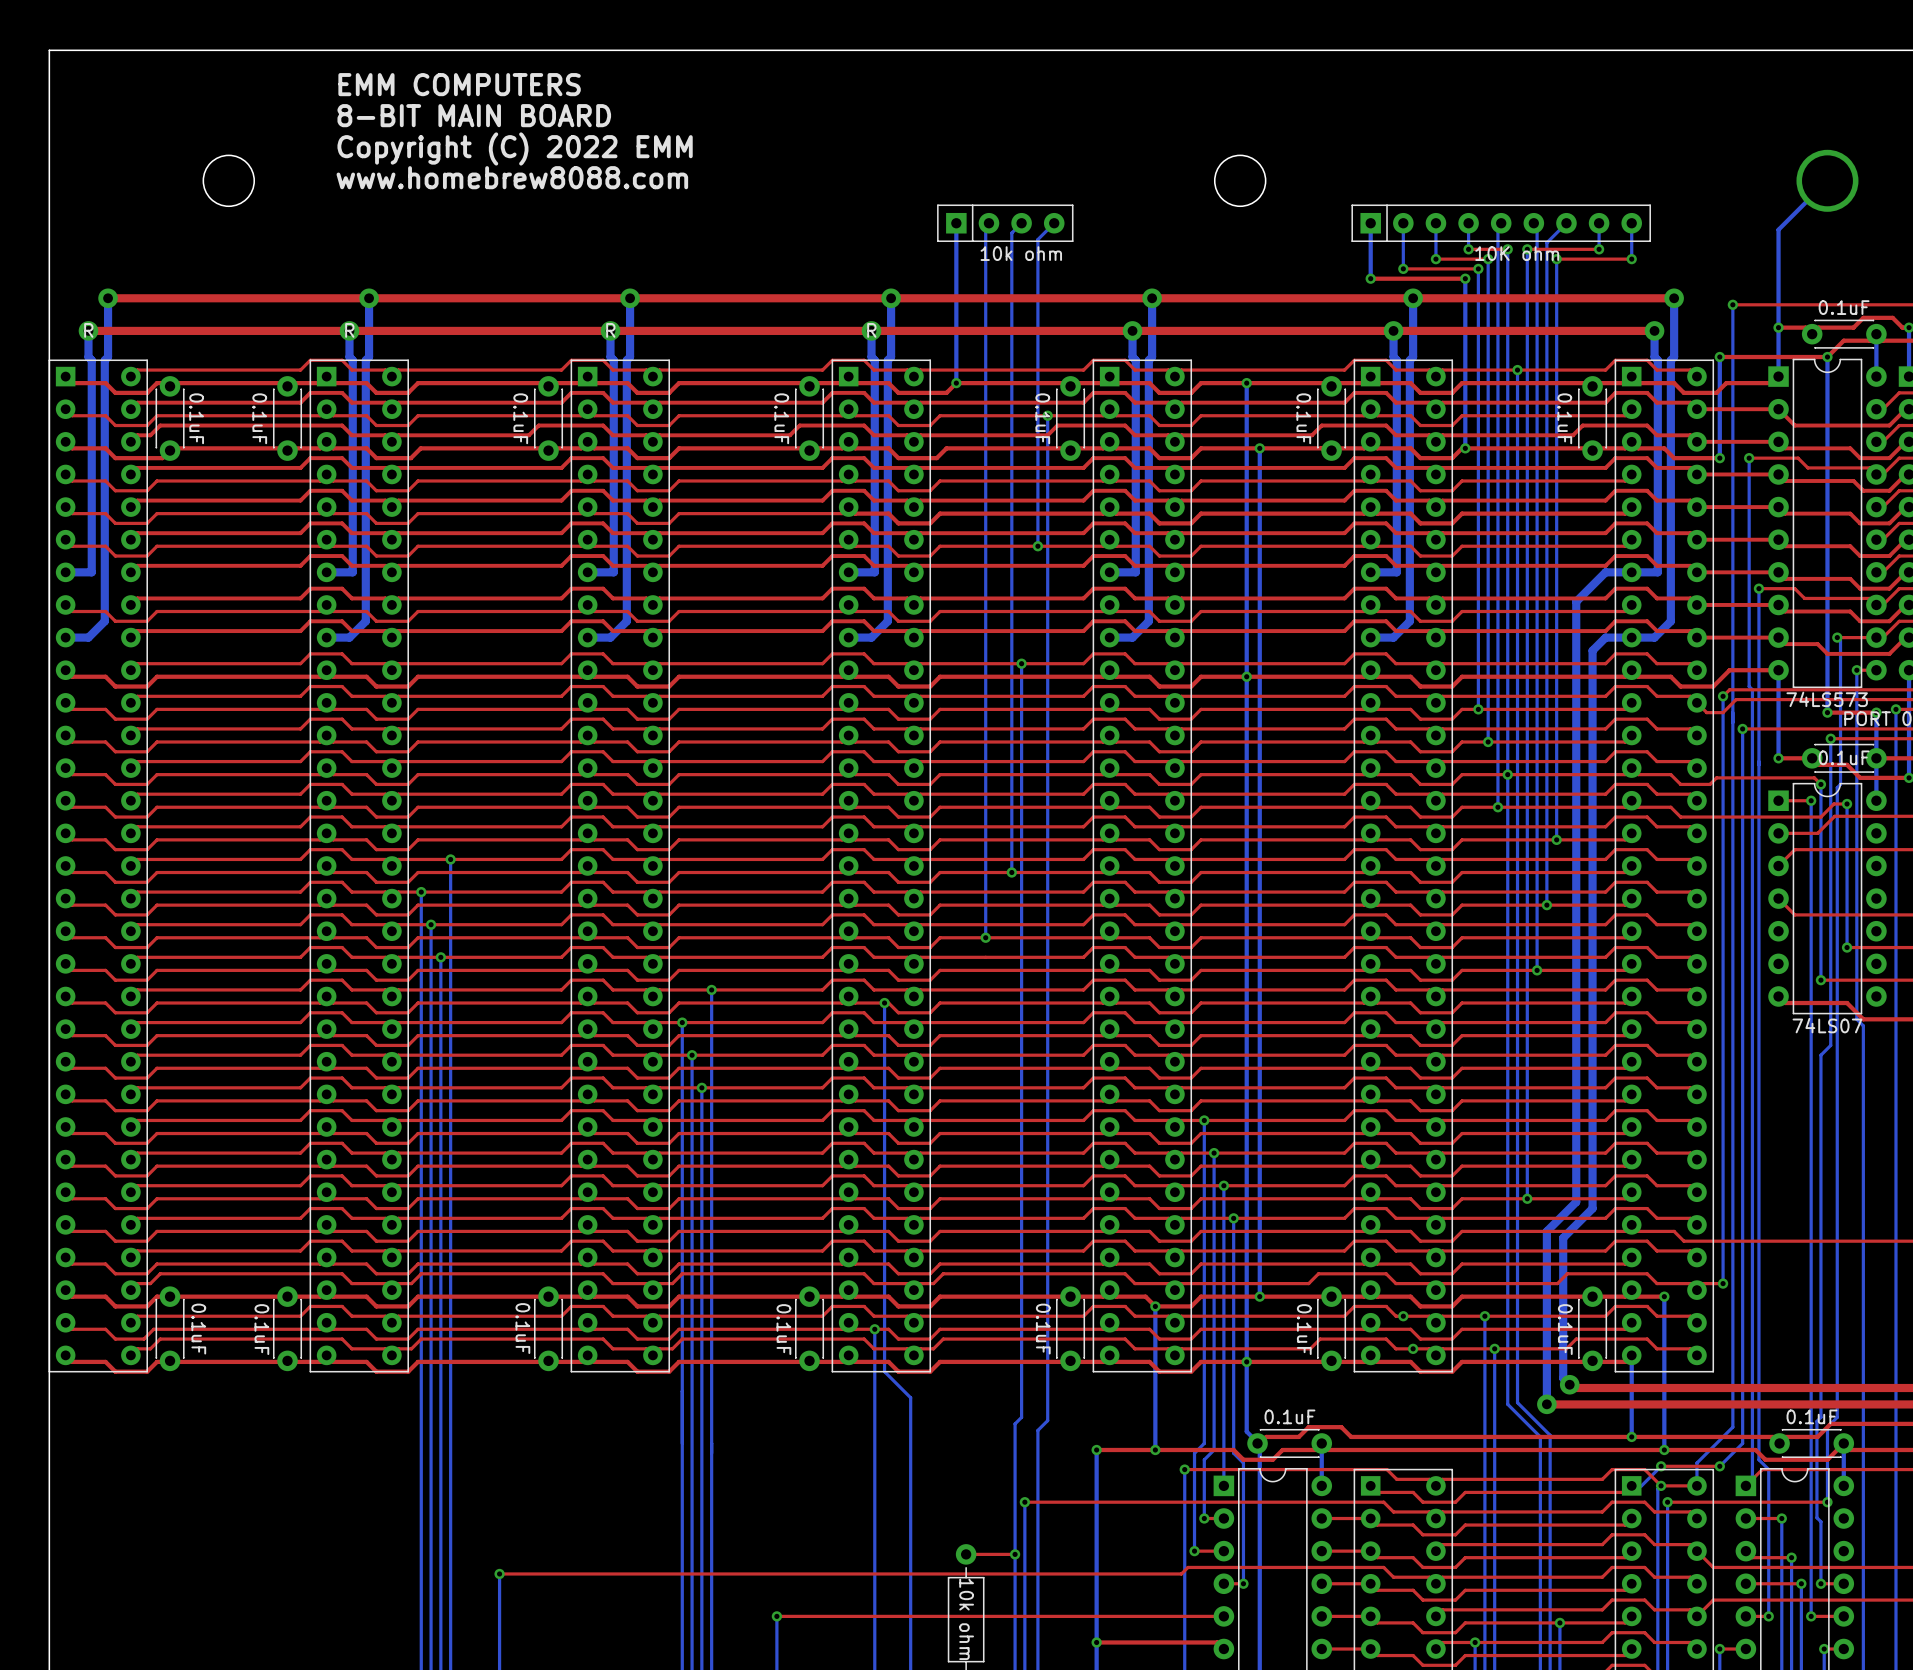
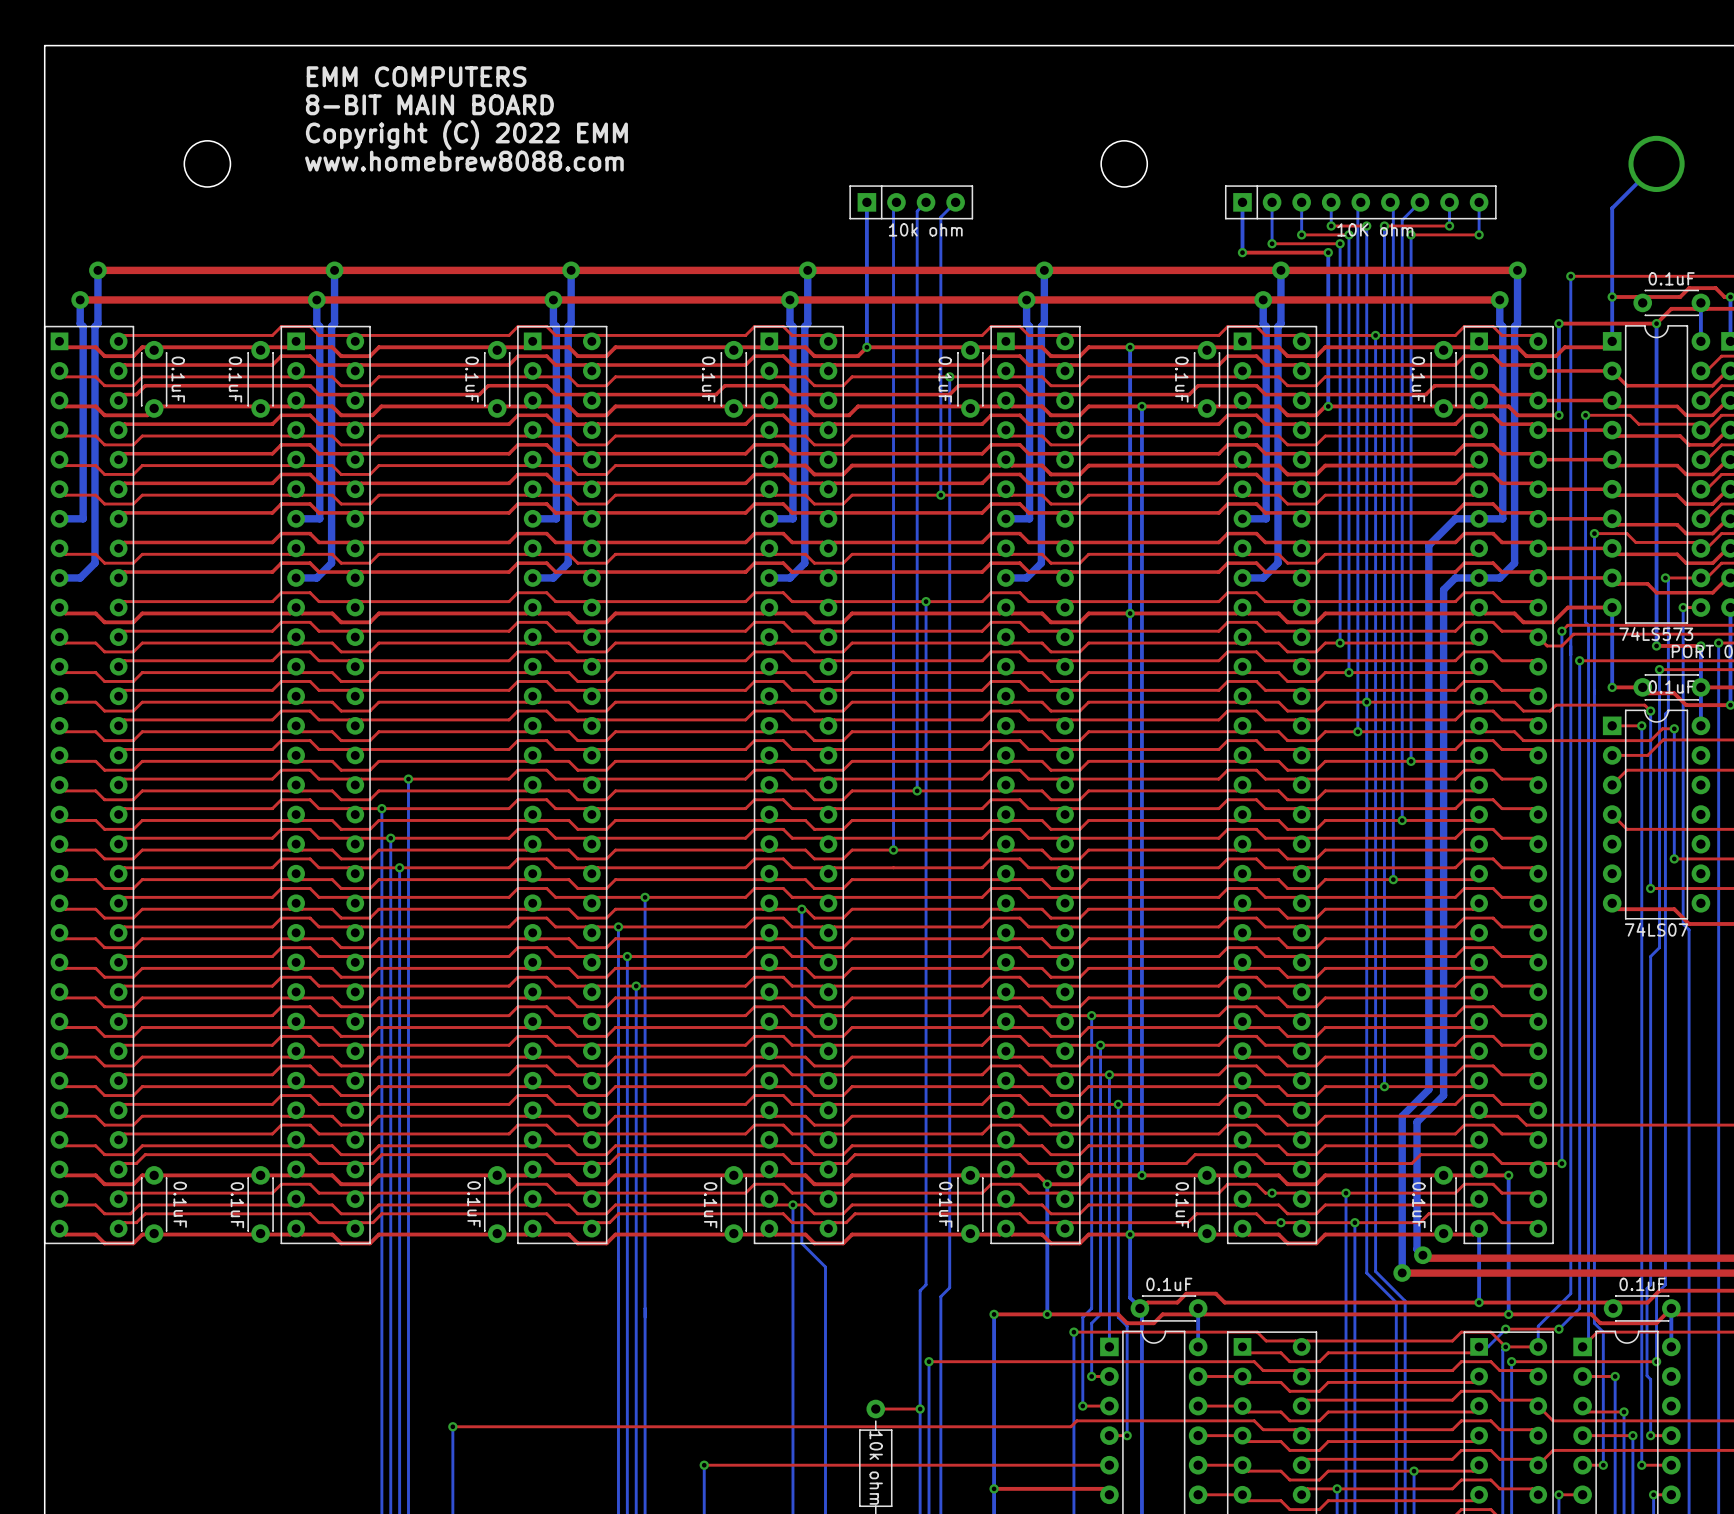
R name: R (88, 330) -> none
R name: R (349, 330) -> none
R name: R (610, 330) -> none
R name: R (871, 330) -> none

